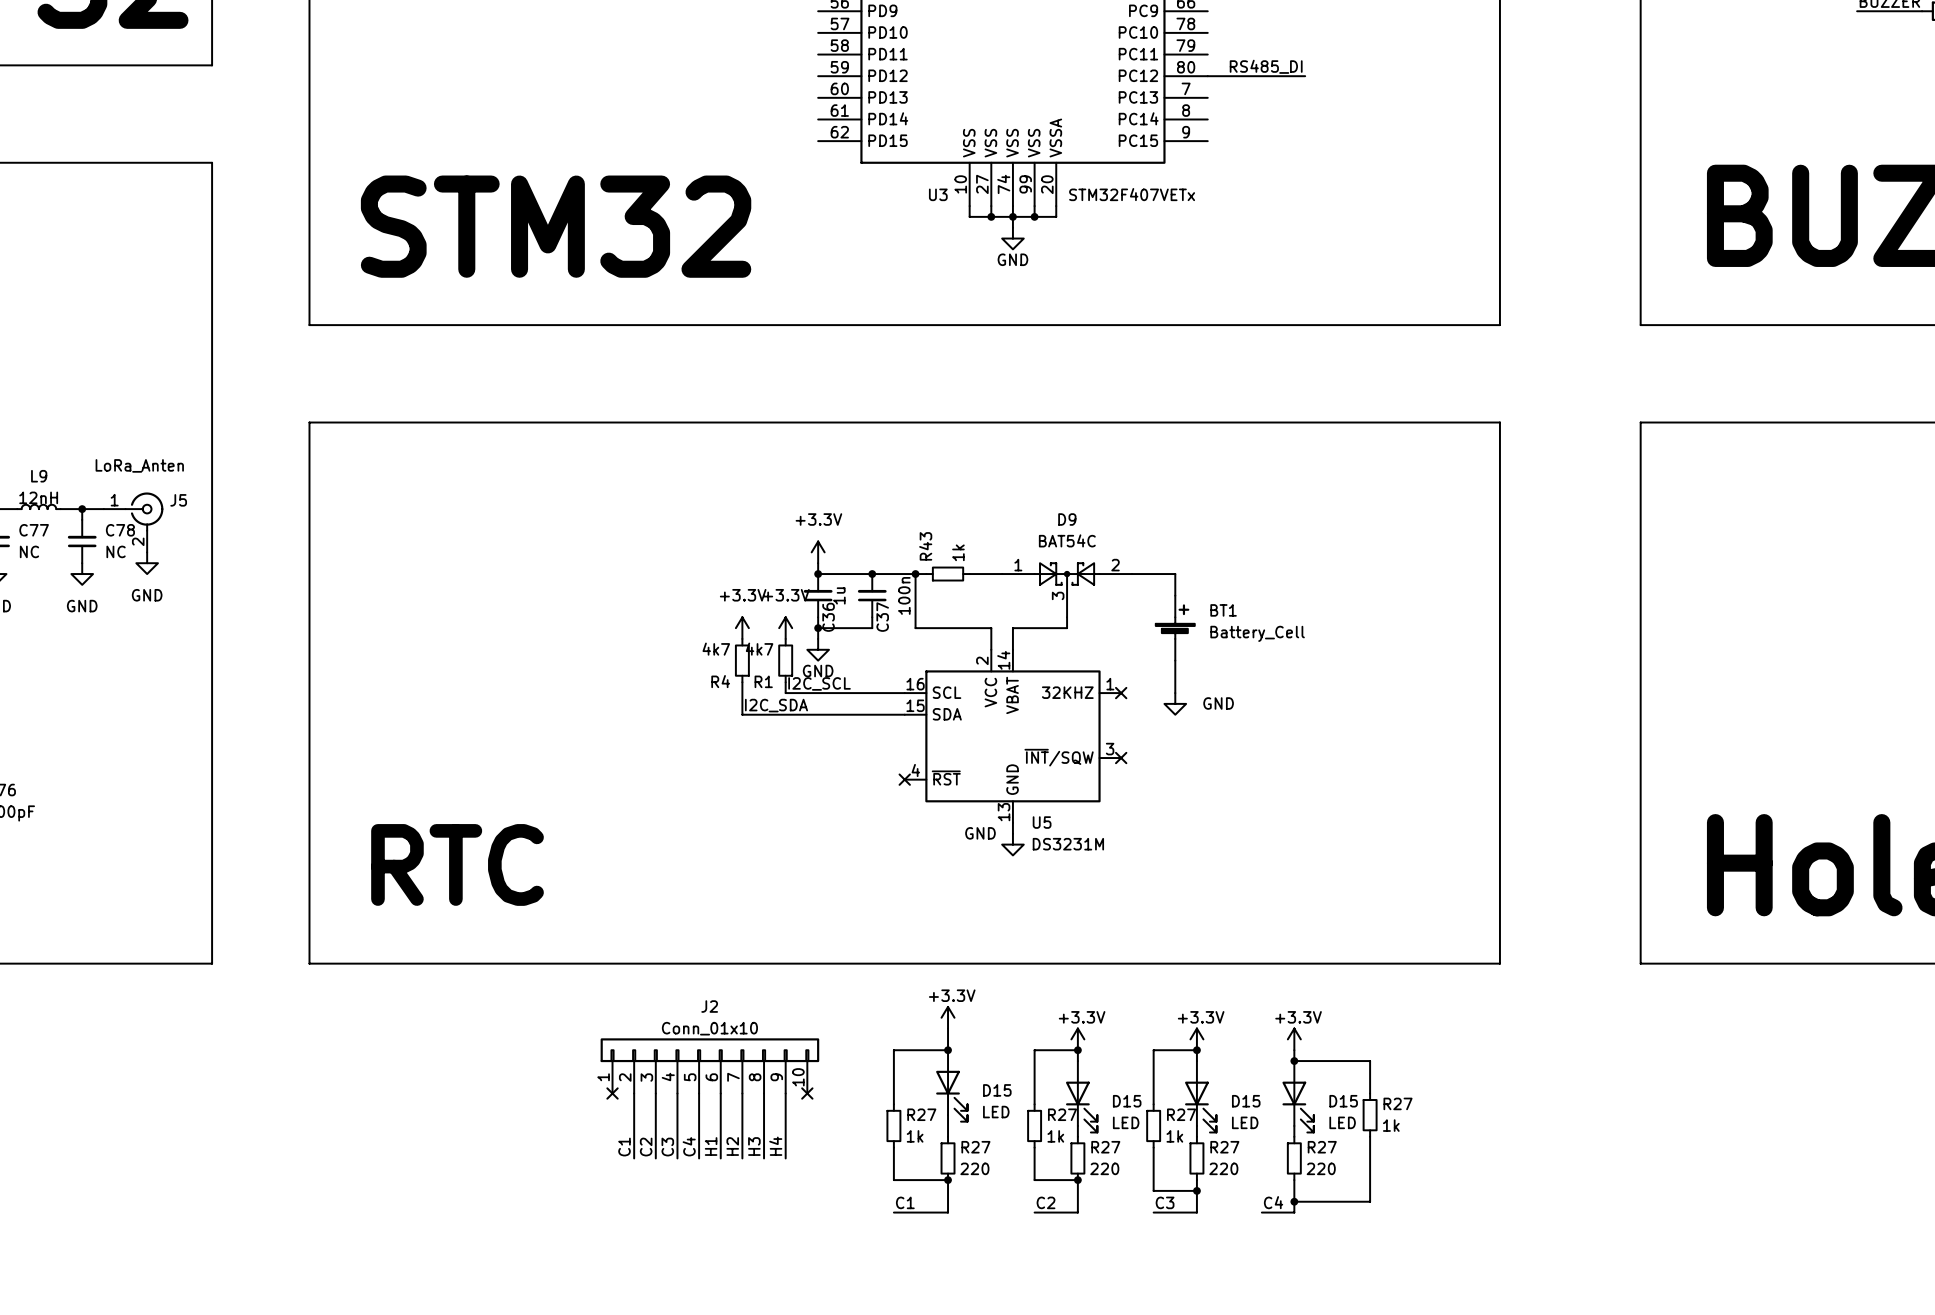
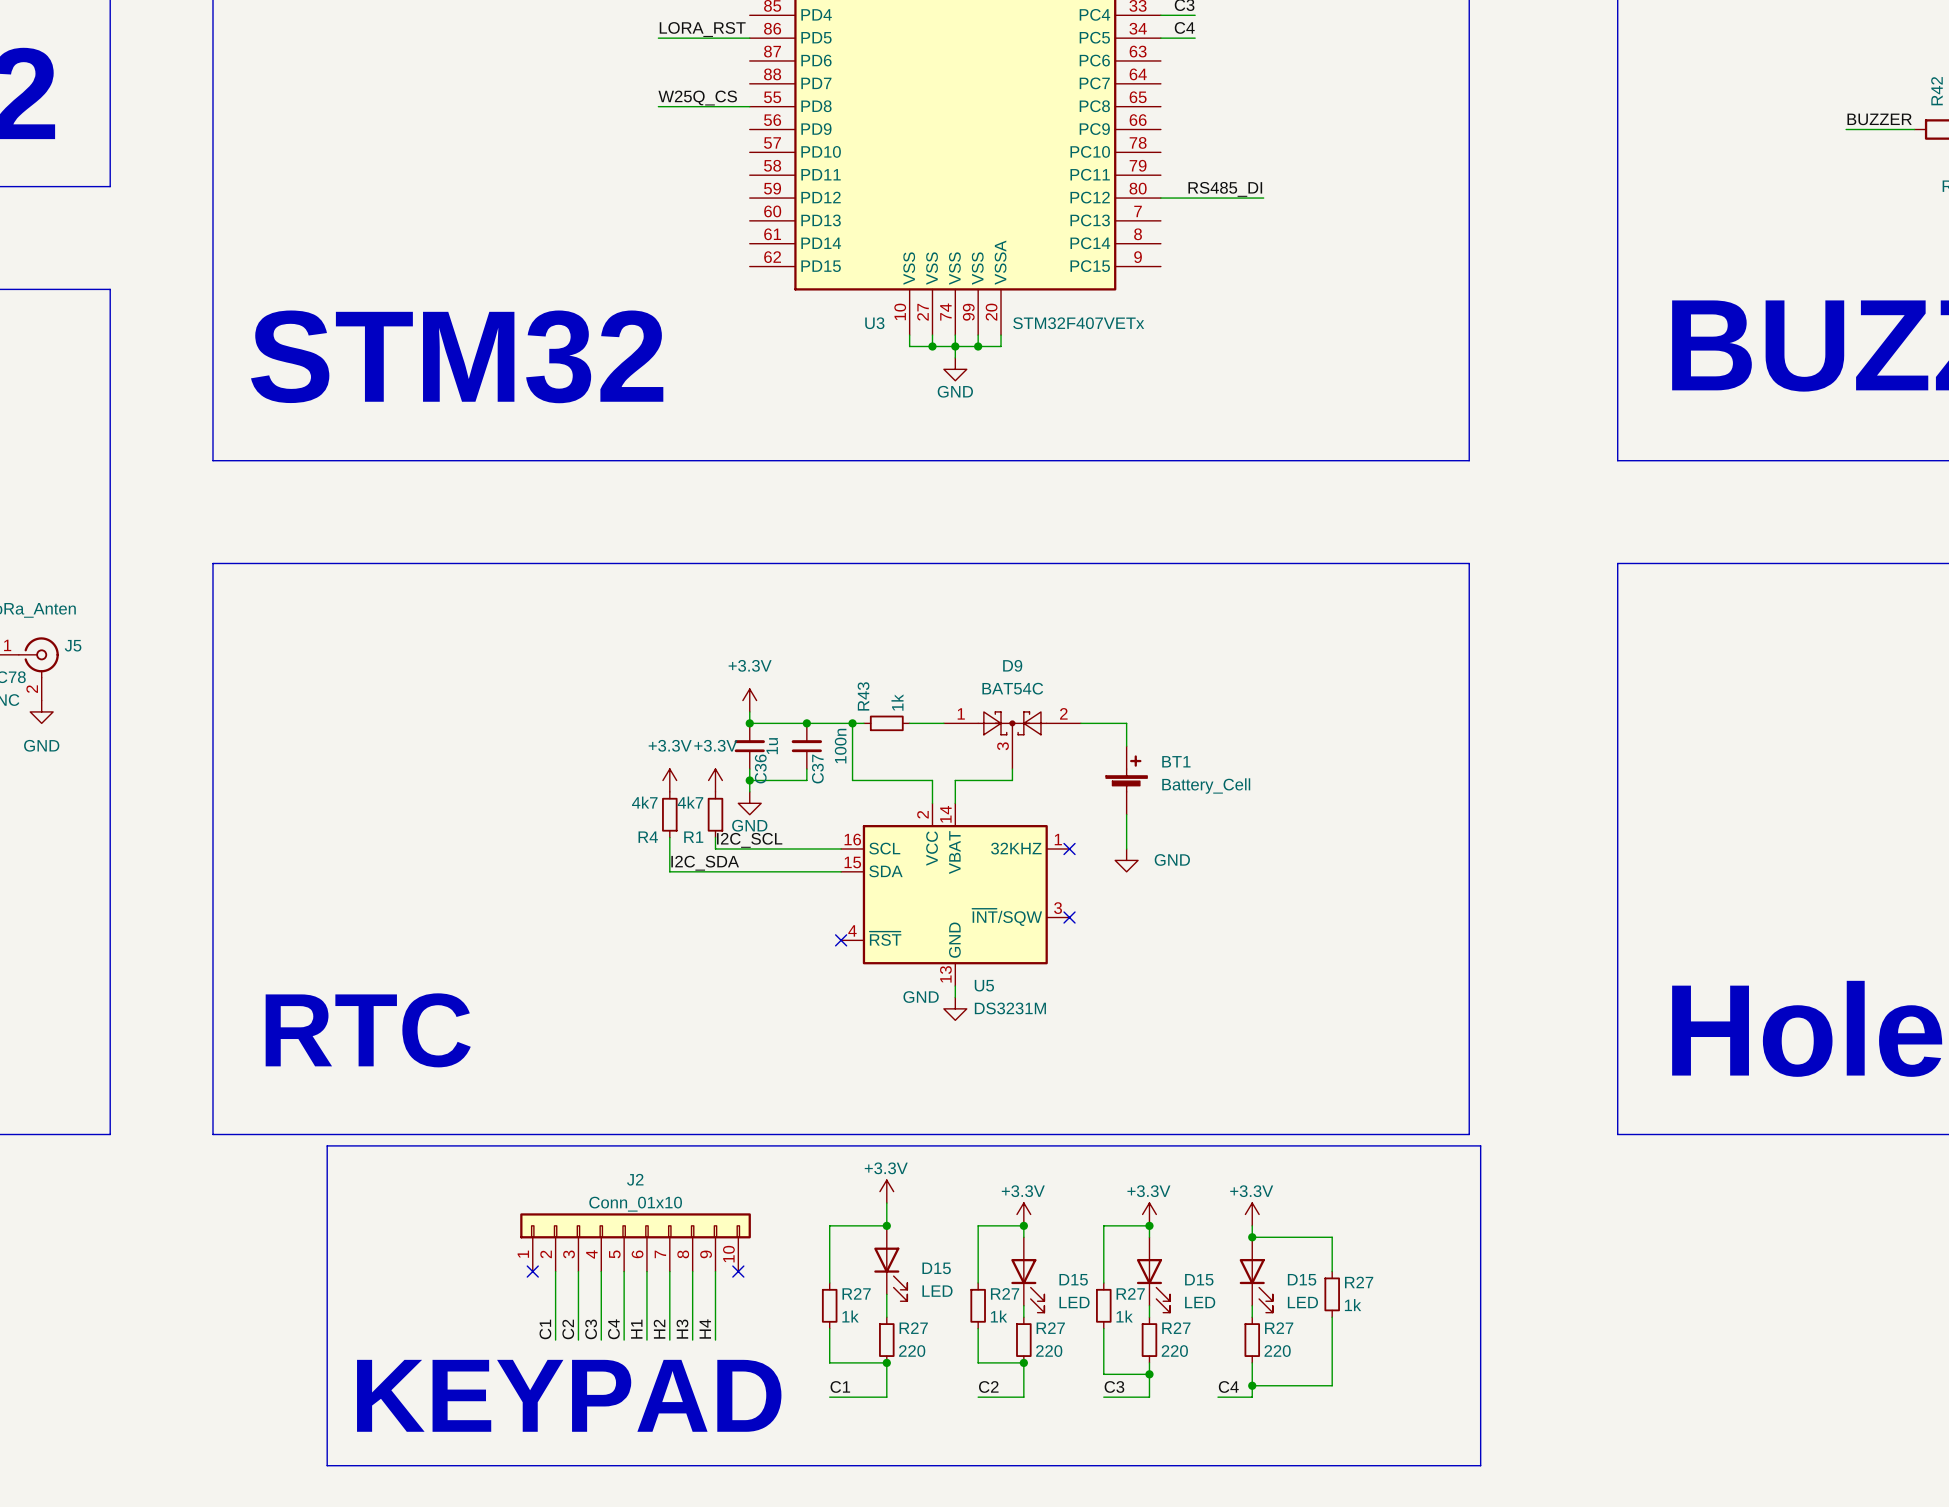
line: none -> (327, 1145) (1480, 1145) (1480, 1465) (327, 1465) (327, 1145)
text: none -> KEYPAD (569, 1395)

